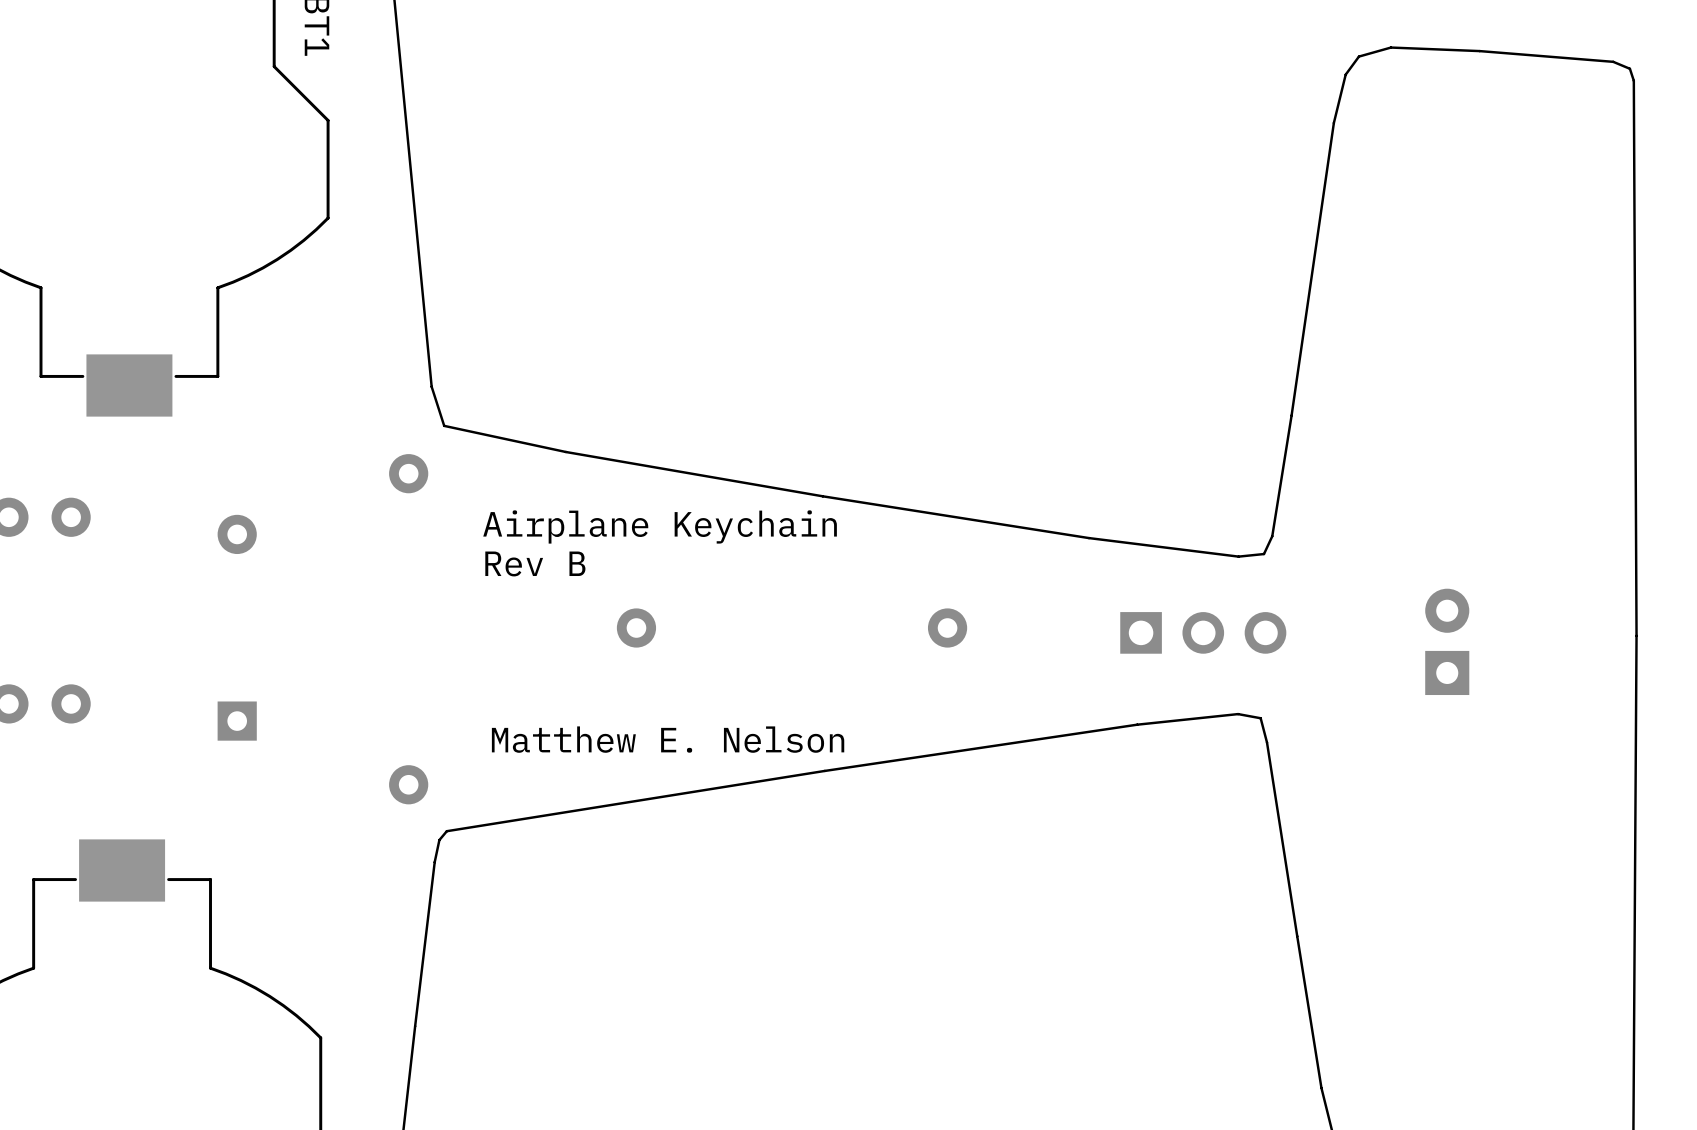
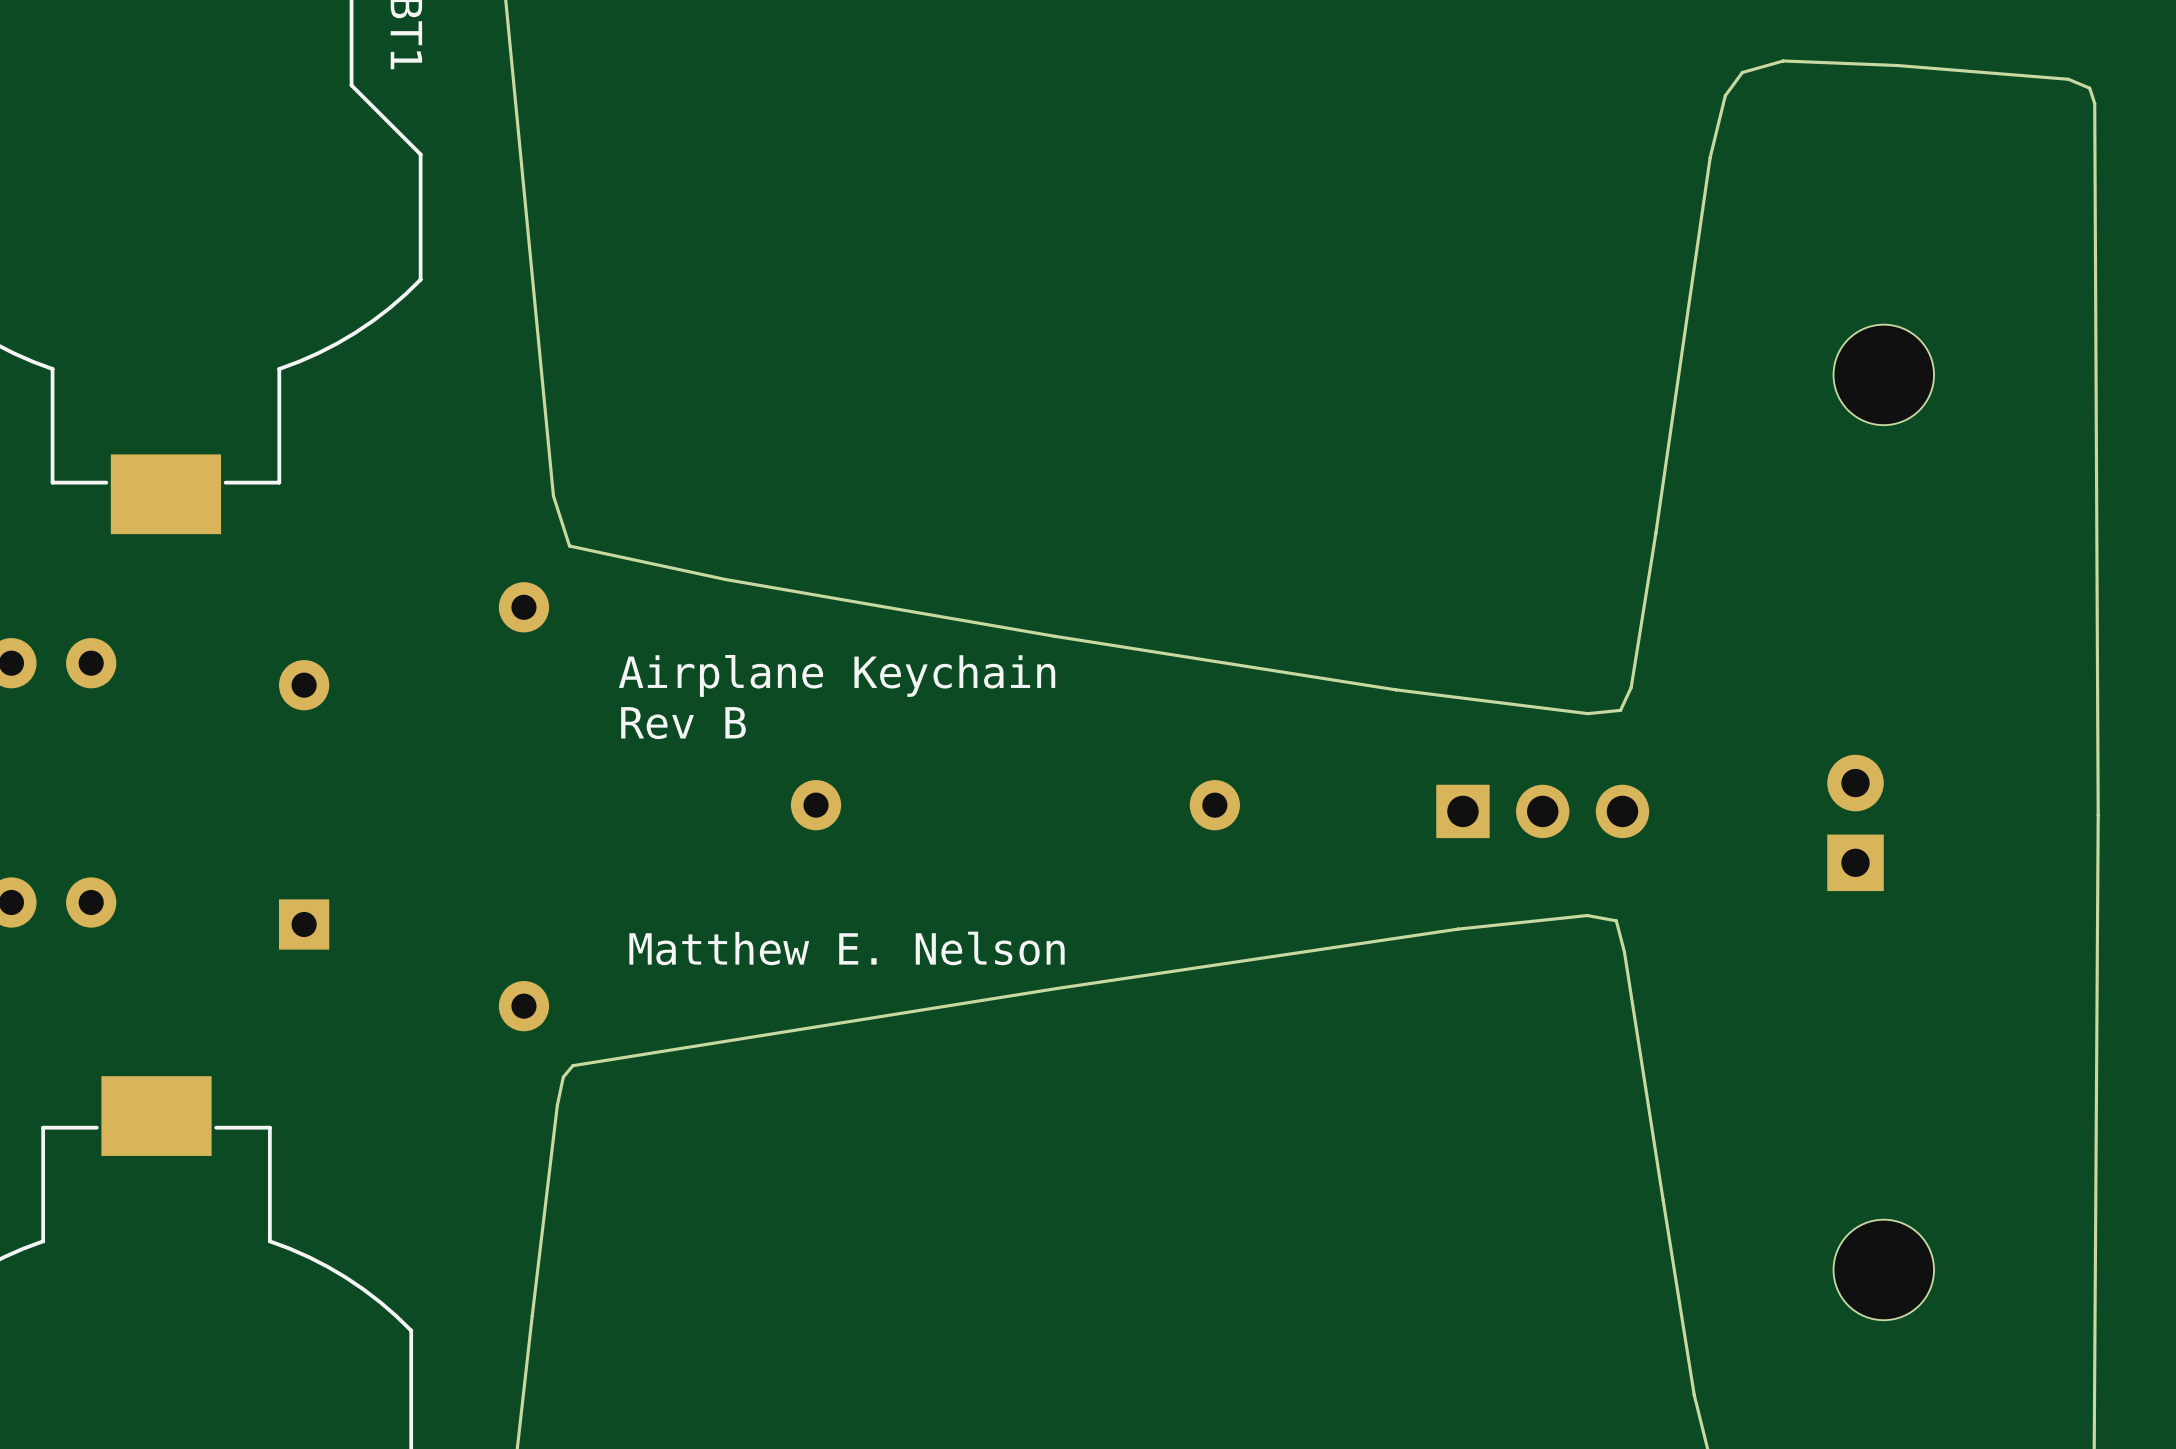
part: none -> (1883, 374)
part: none -> (1883, 1269)

